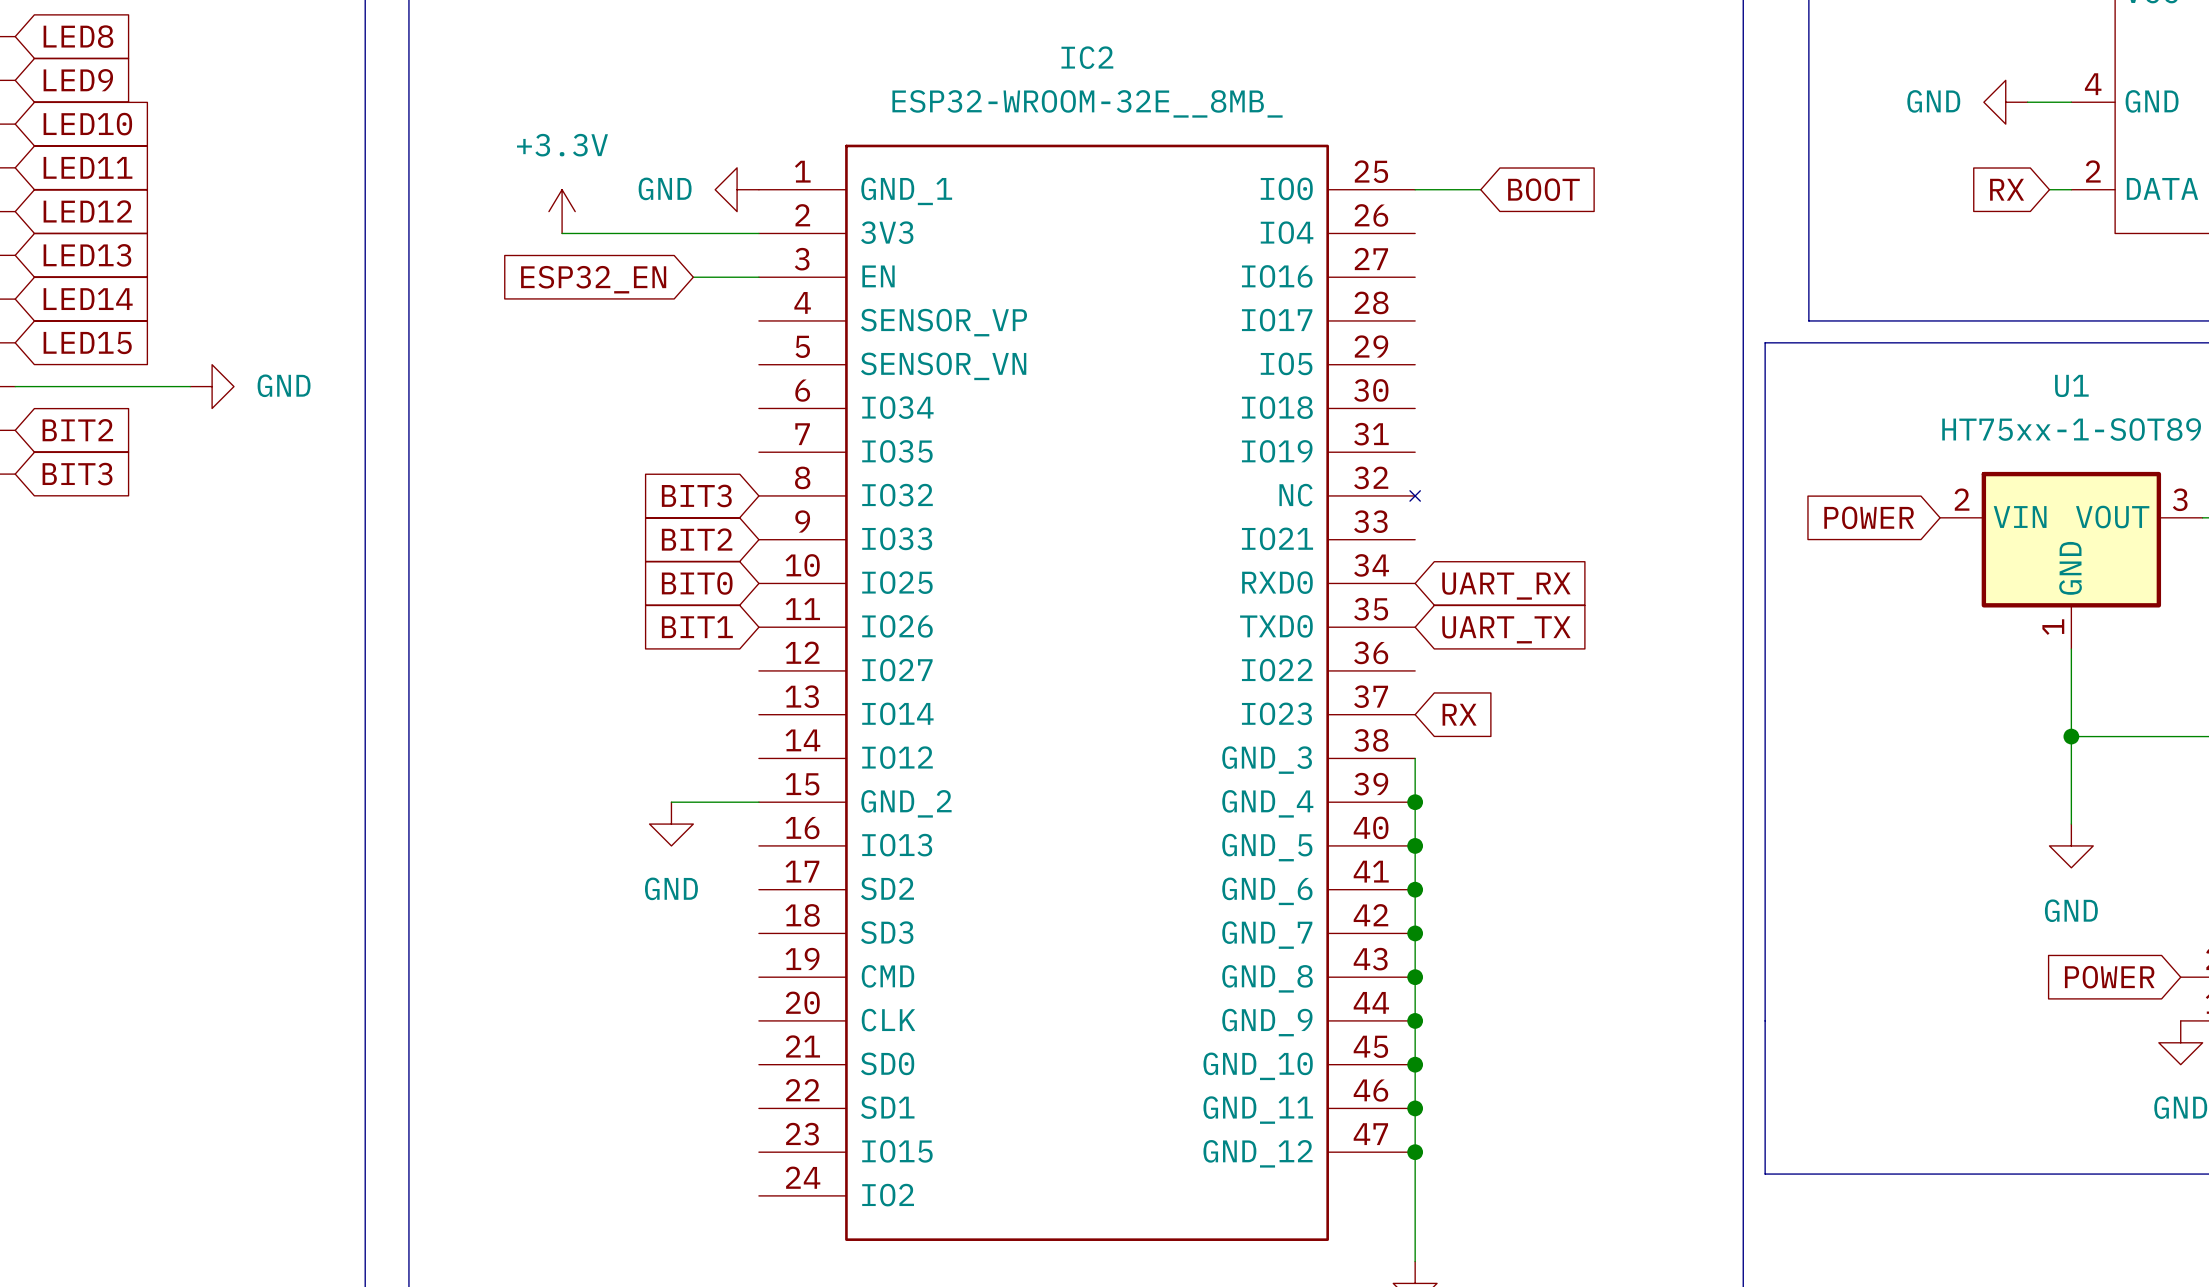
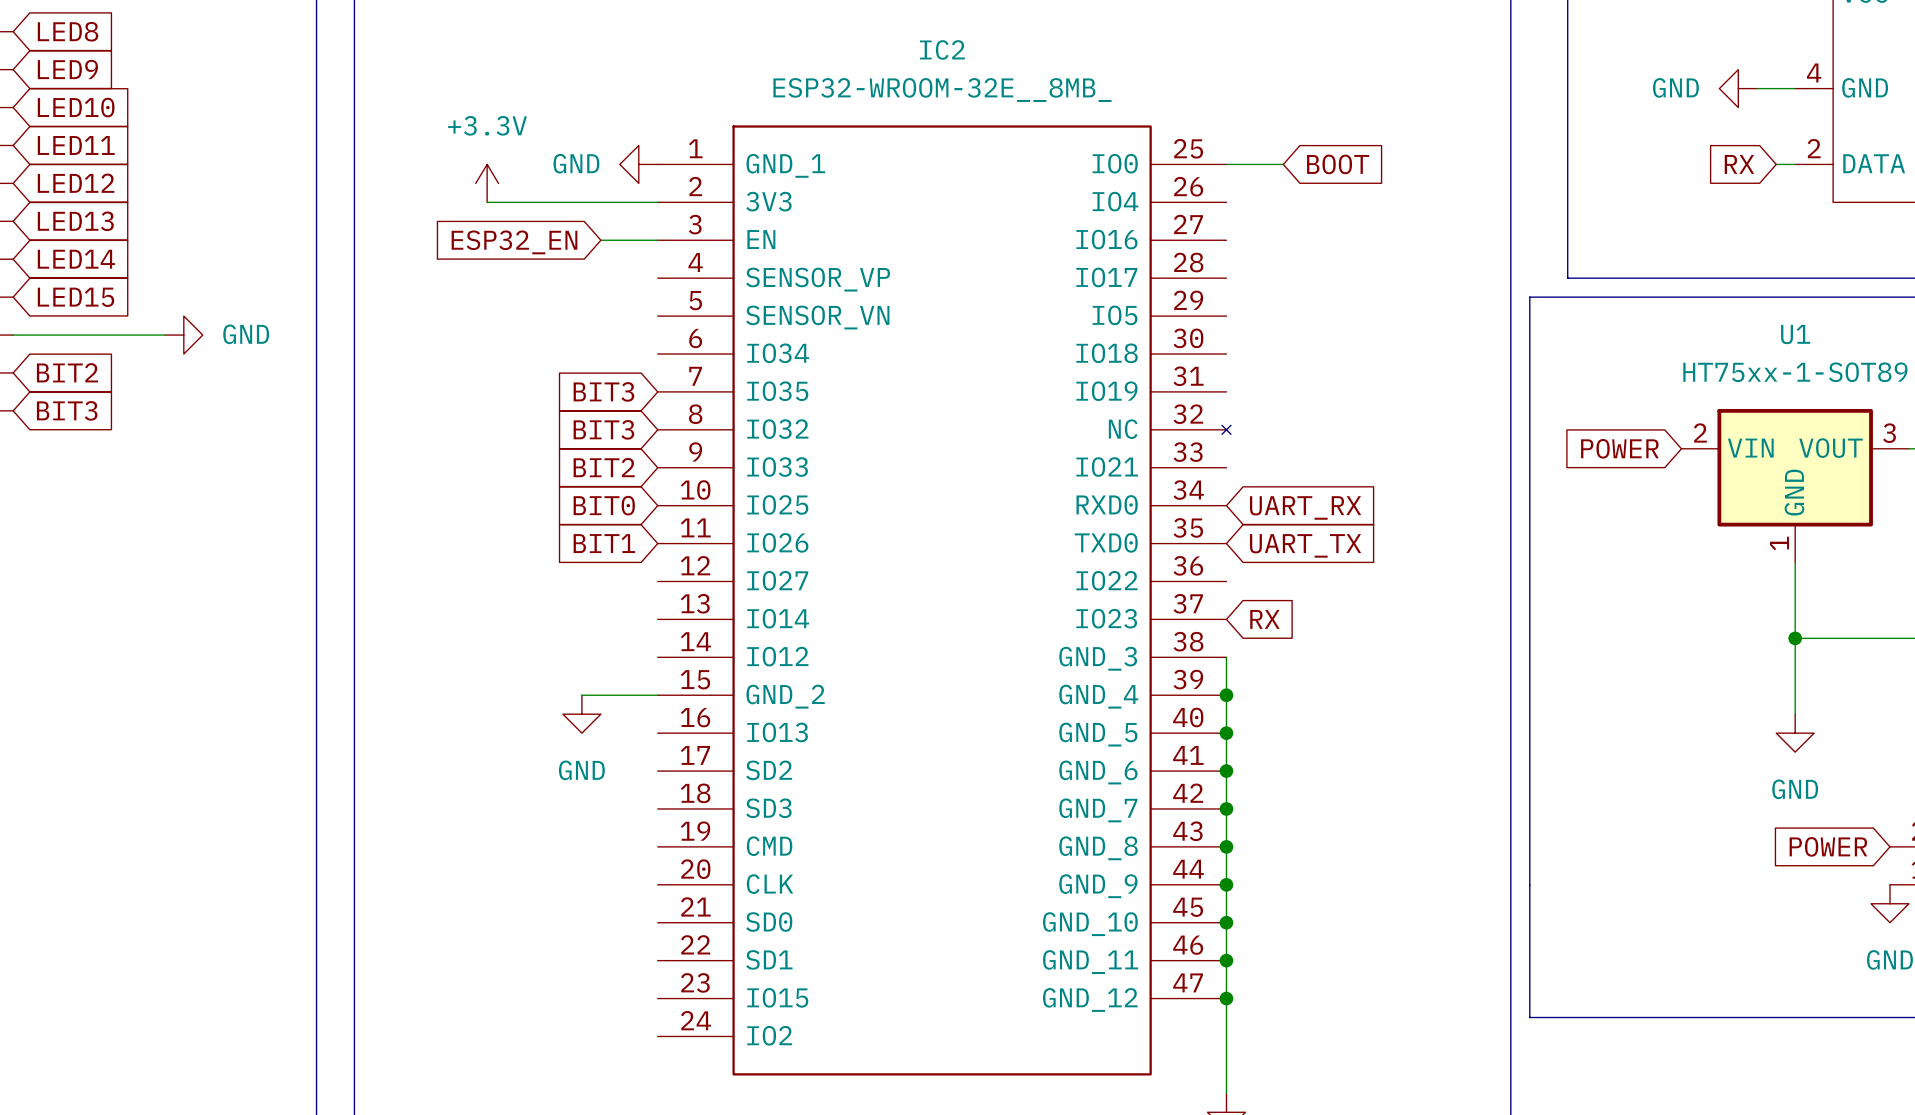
global label: none -> BIT3 (603, 391)

